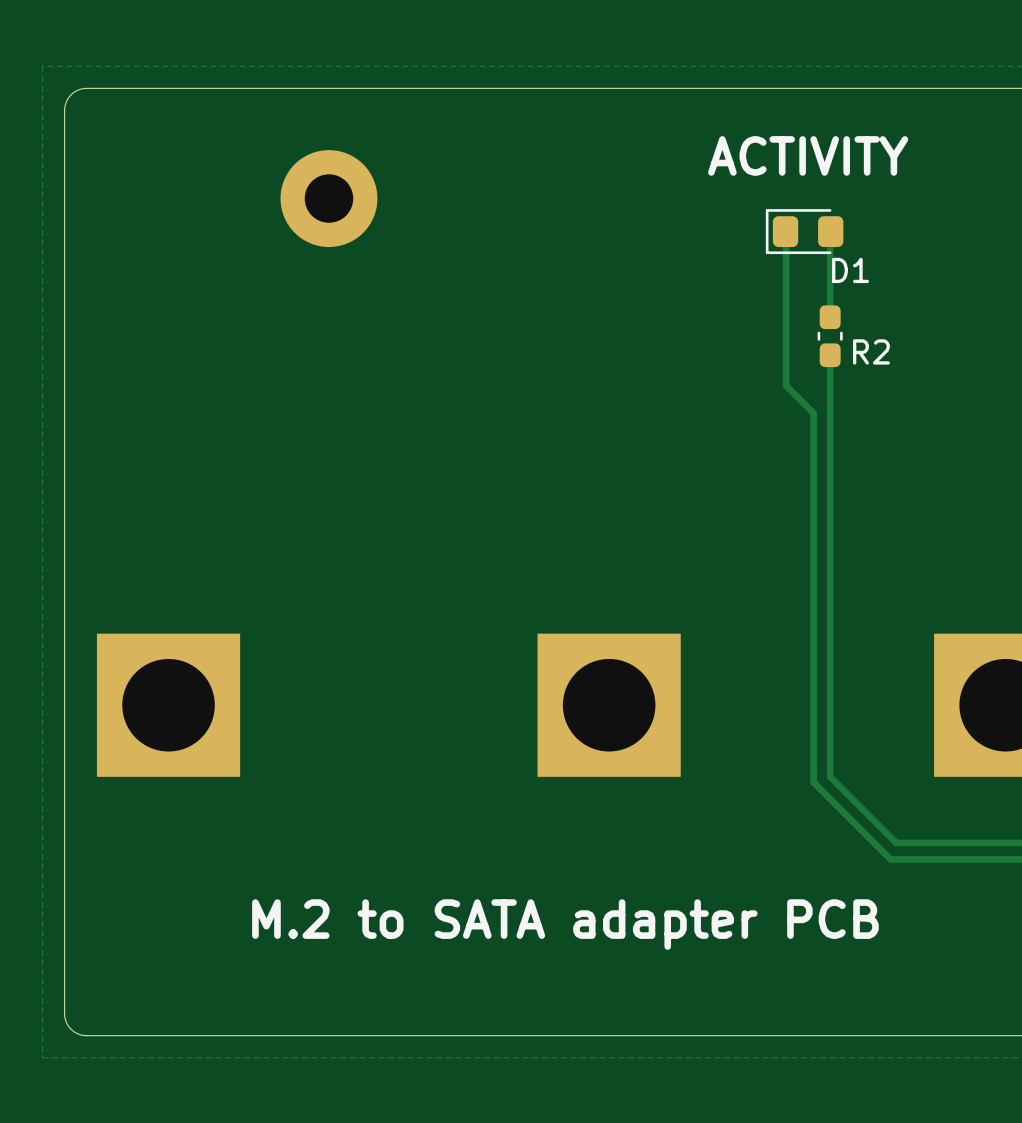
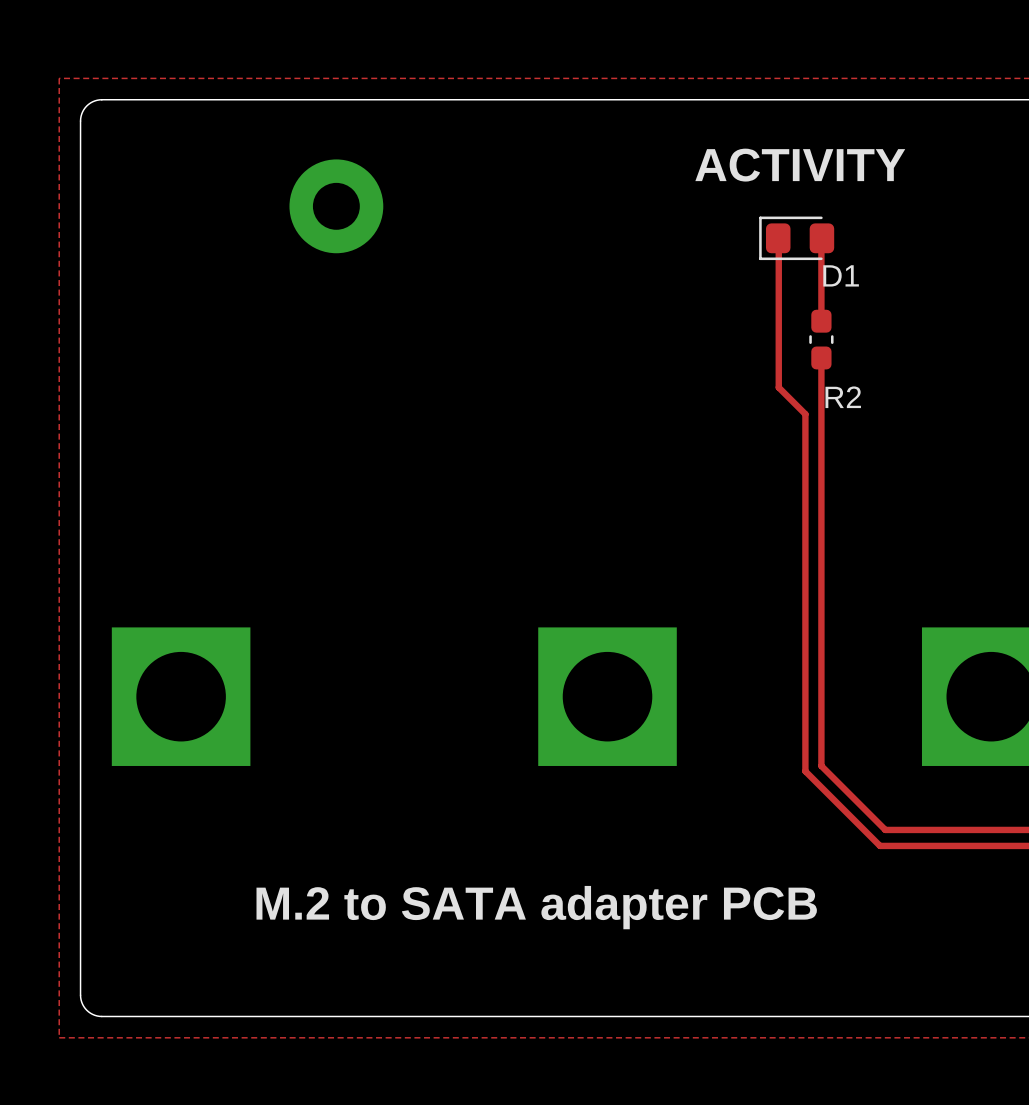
R2 name position: R2 (871, 351) -> R2 (843, 397)

